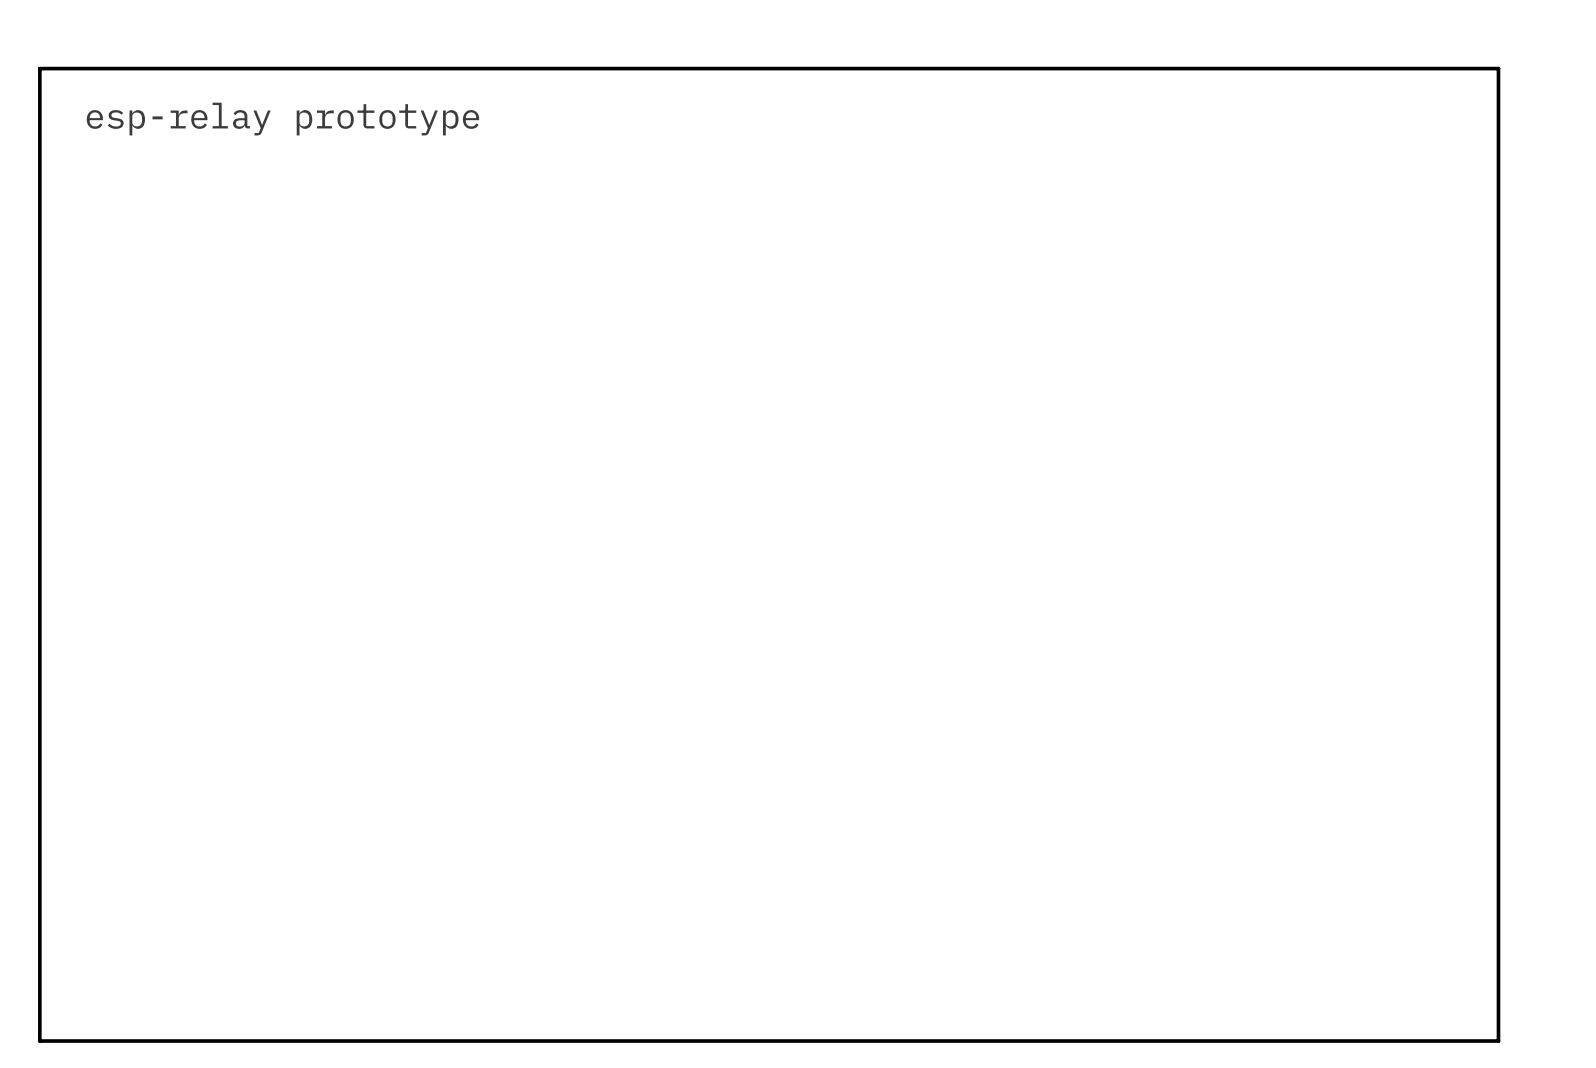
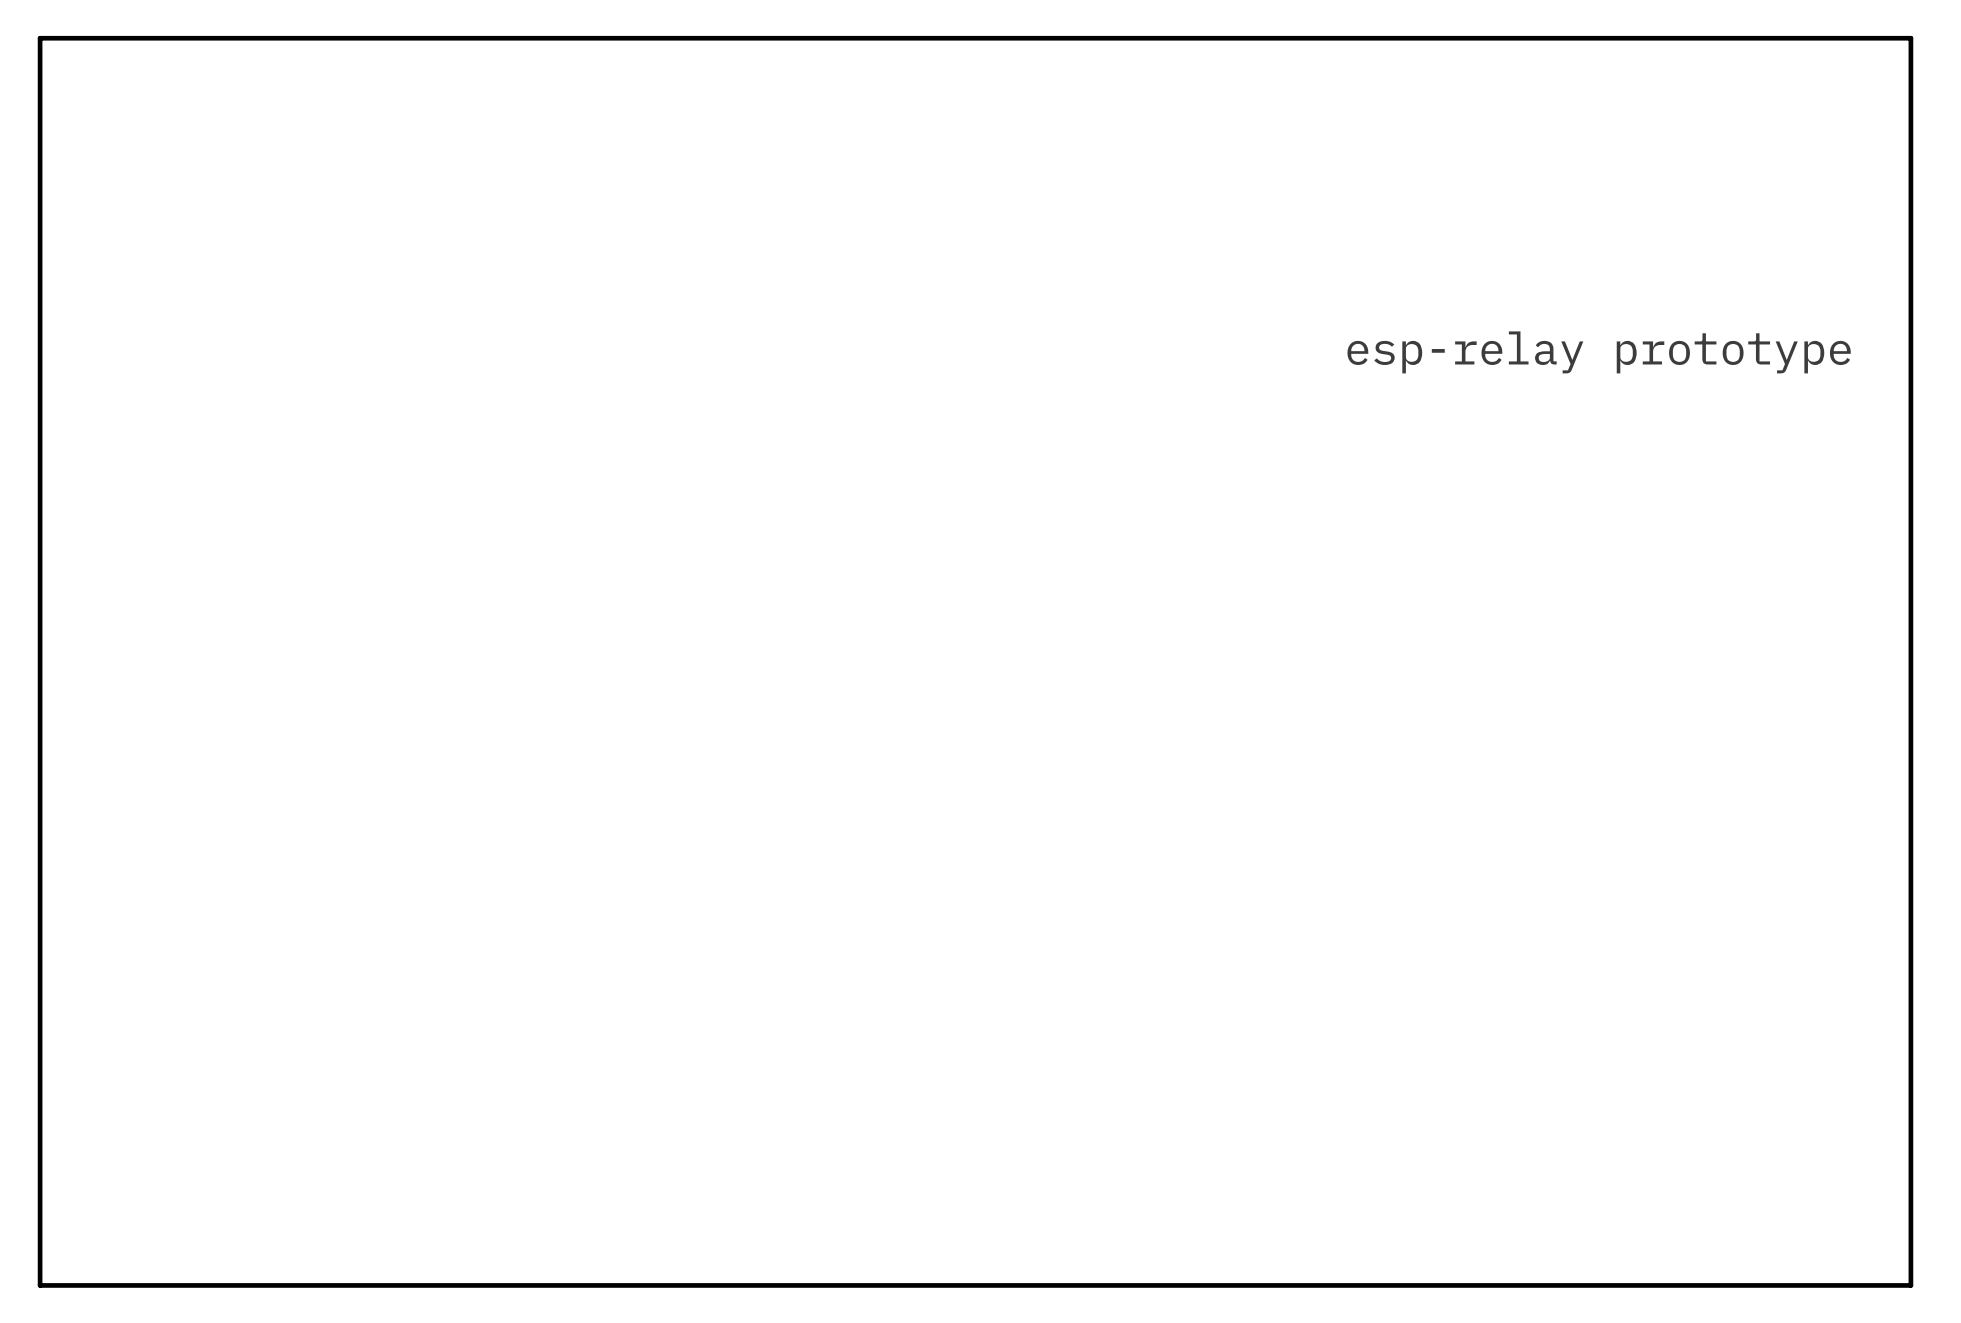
text: esp-relay prototype (282, 119) -> none
text: none -> esp-relay prototype (1599, 352)

